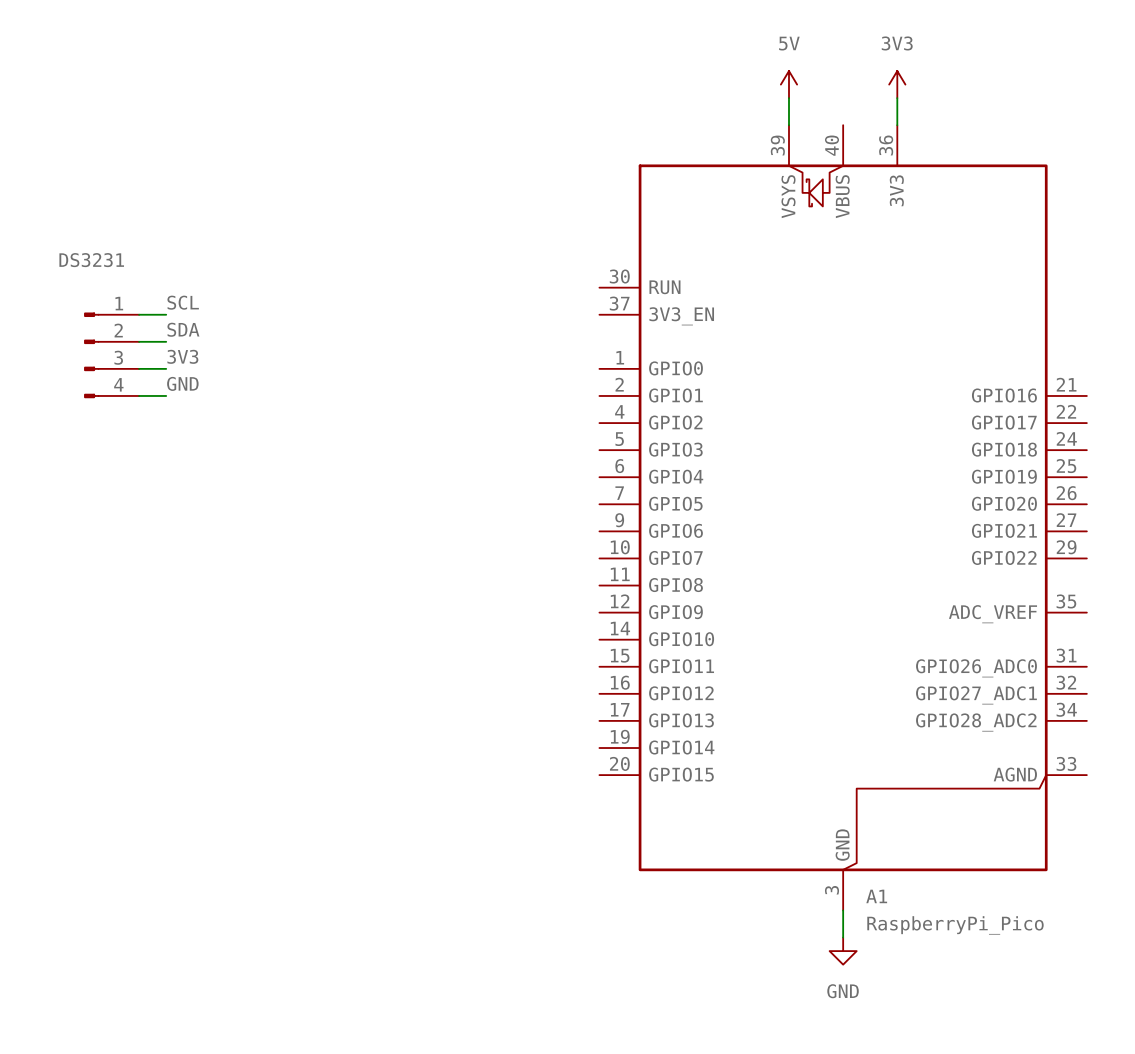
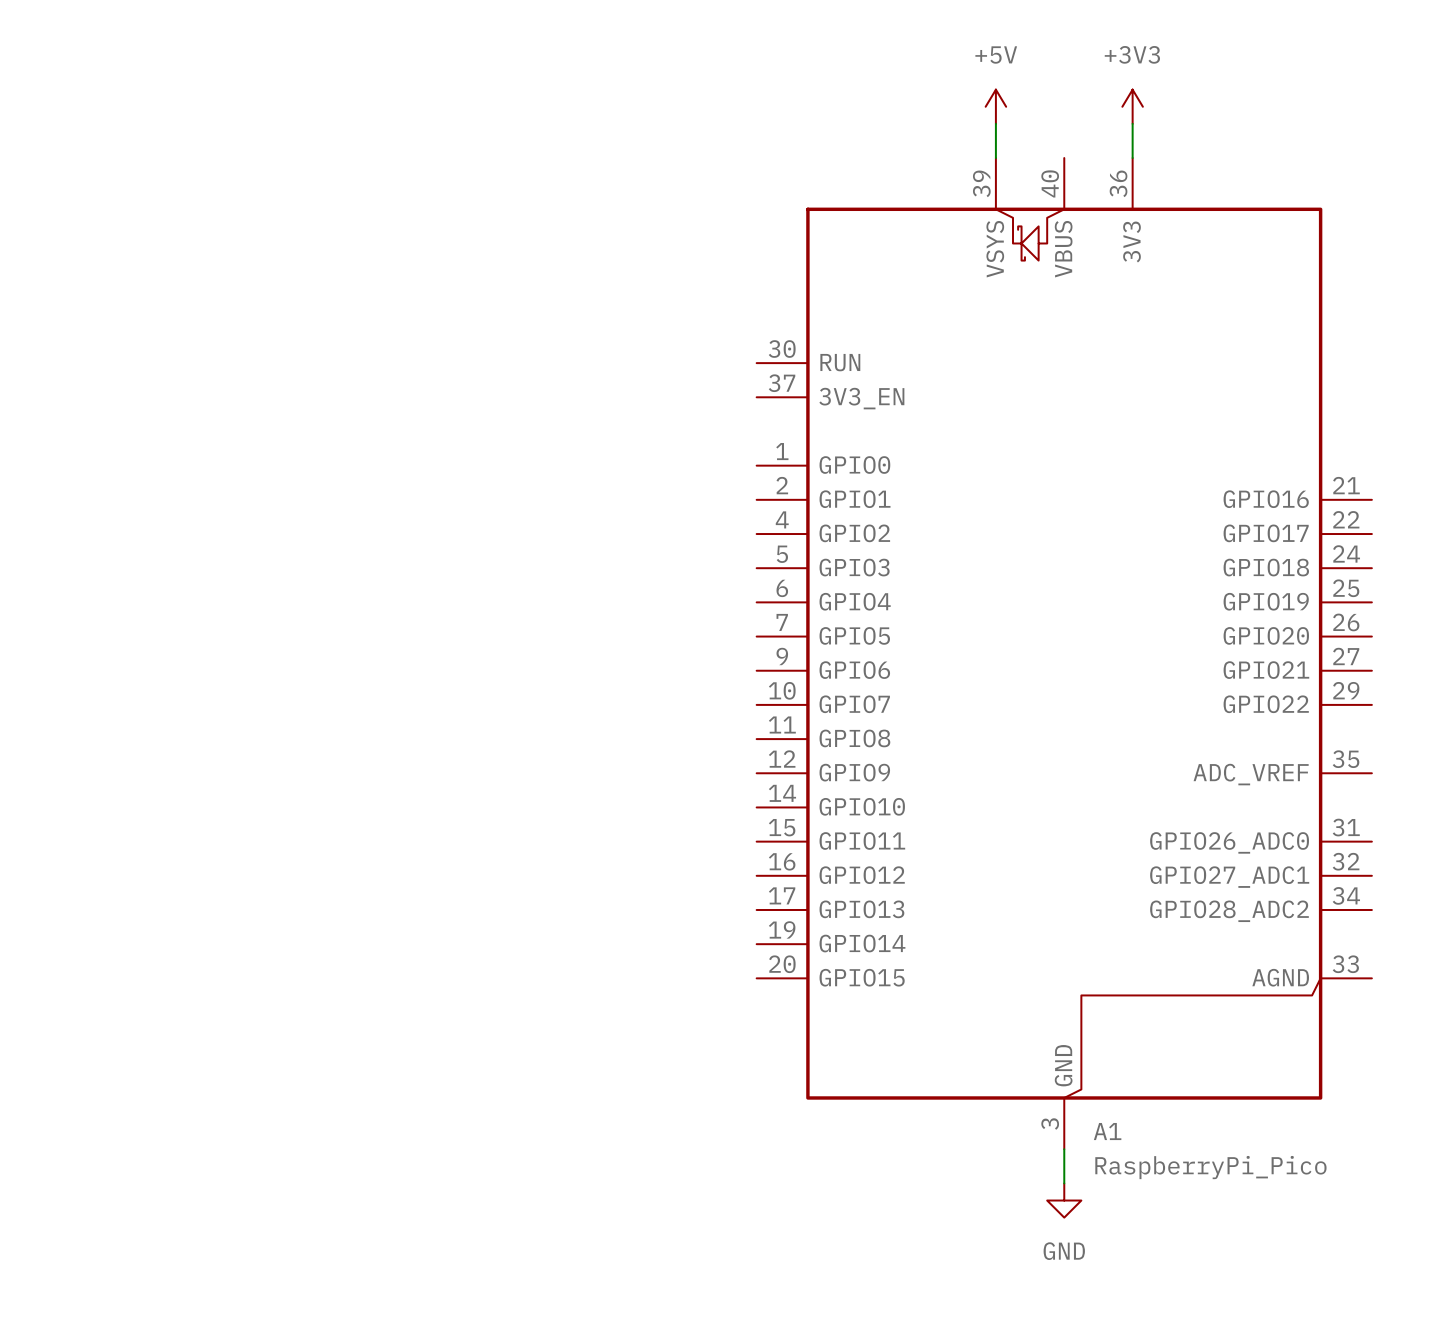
power symbol: 5V (788, 84) -> +5V (995, 106)
power symbol: 3V3 (897, 84) -> +3V3 (1132, 106)
label: SCL (183, 302) -> none
wire: (139, 314) (166, 314) -> none
label: SDA (183, 329) -> none
wire: (139, 341) (166, 341) -> none
DS3231: (111, 355) -> none
label: 3V3 (182, 356) -> none
wire: (139, 368) (166, 368) -> none
label: GND (182, 383) -> none
wire: (139, 395) (166, 395) -> none

